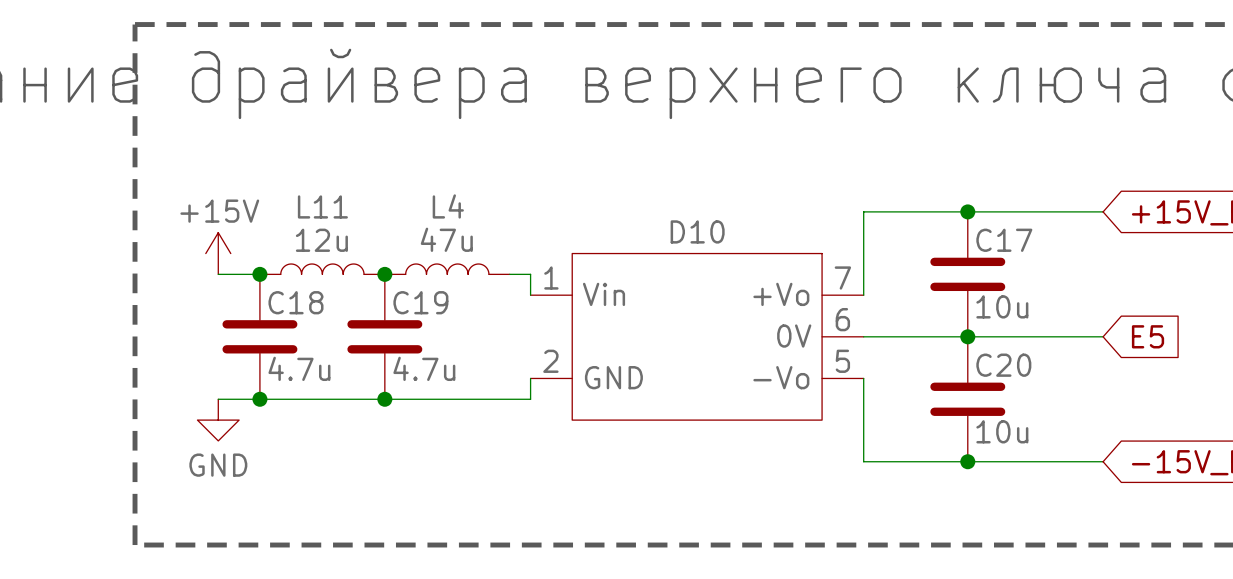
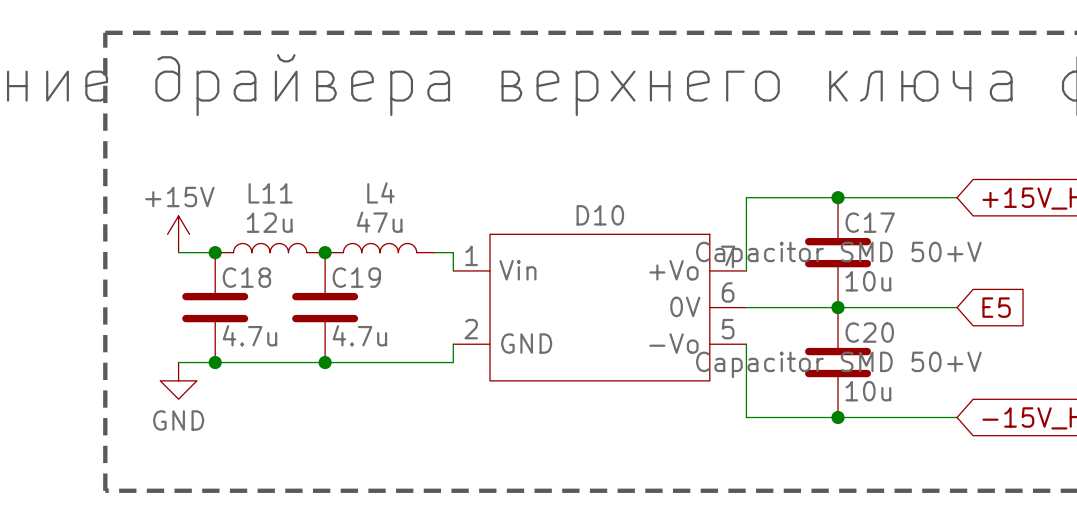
C17 text: none -> Capacitor SMD 50+V (838, 255)
C20 text: none -> Capacitor SMD 50+V (838, 364)

